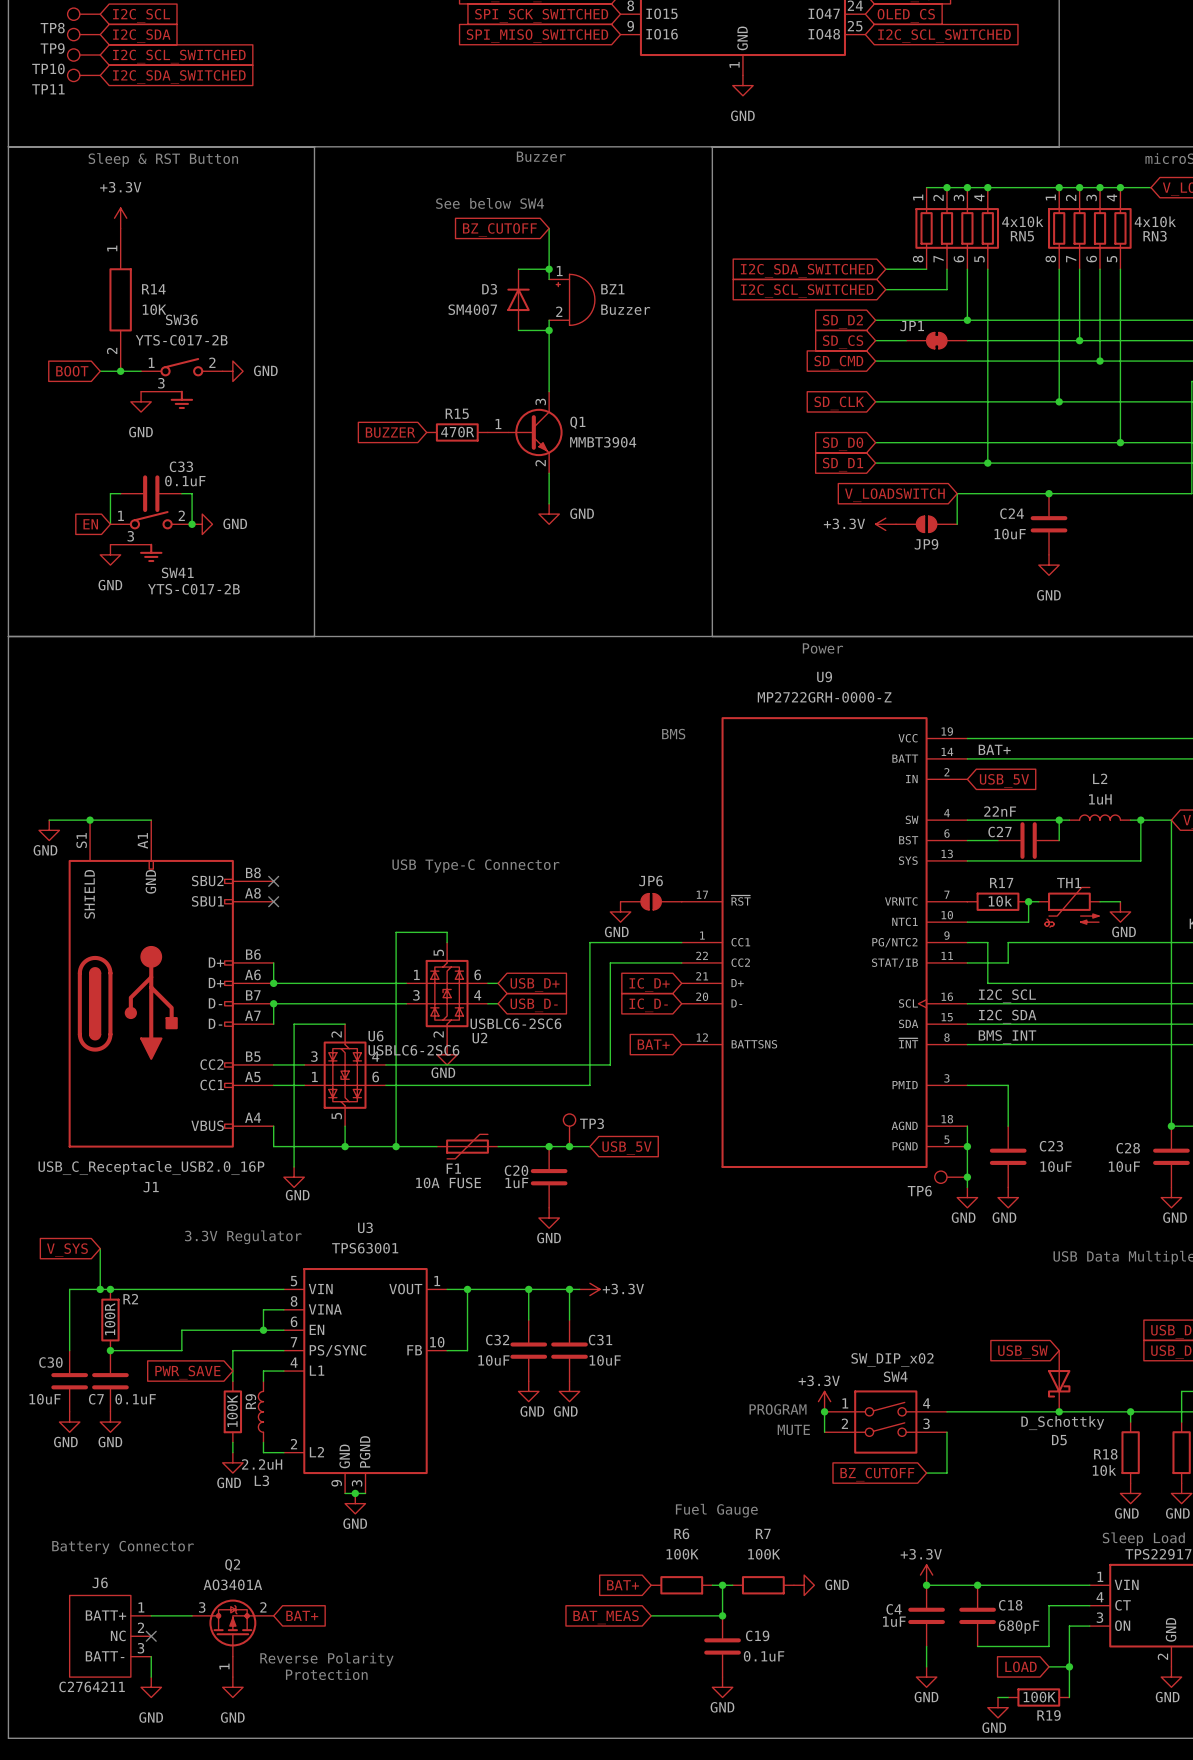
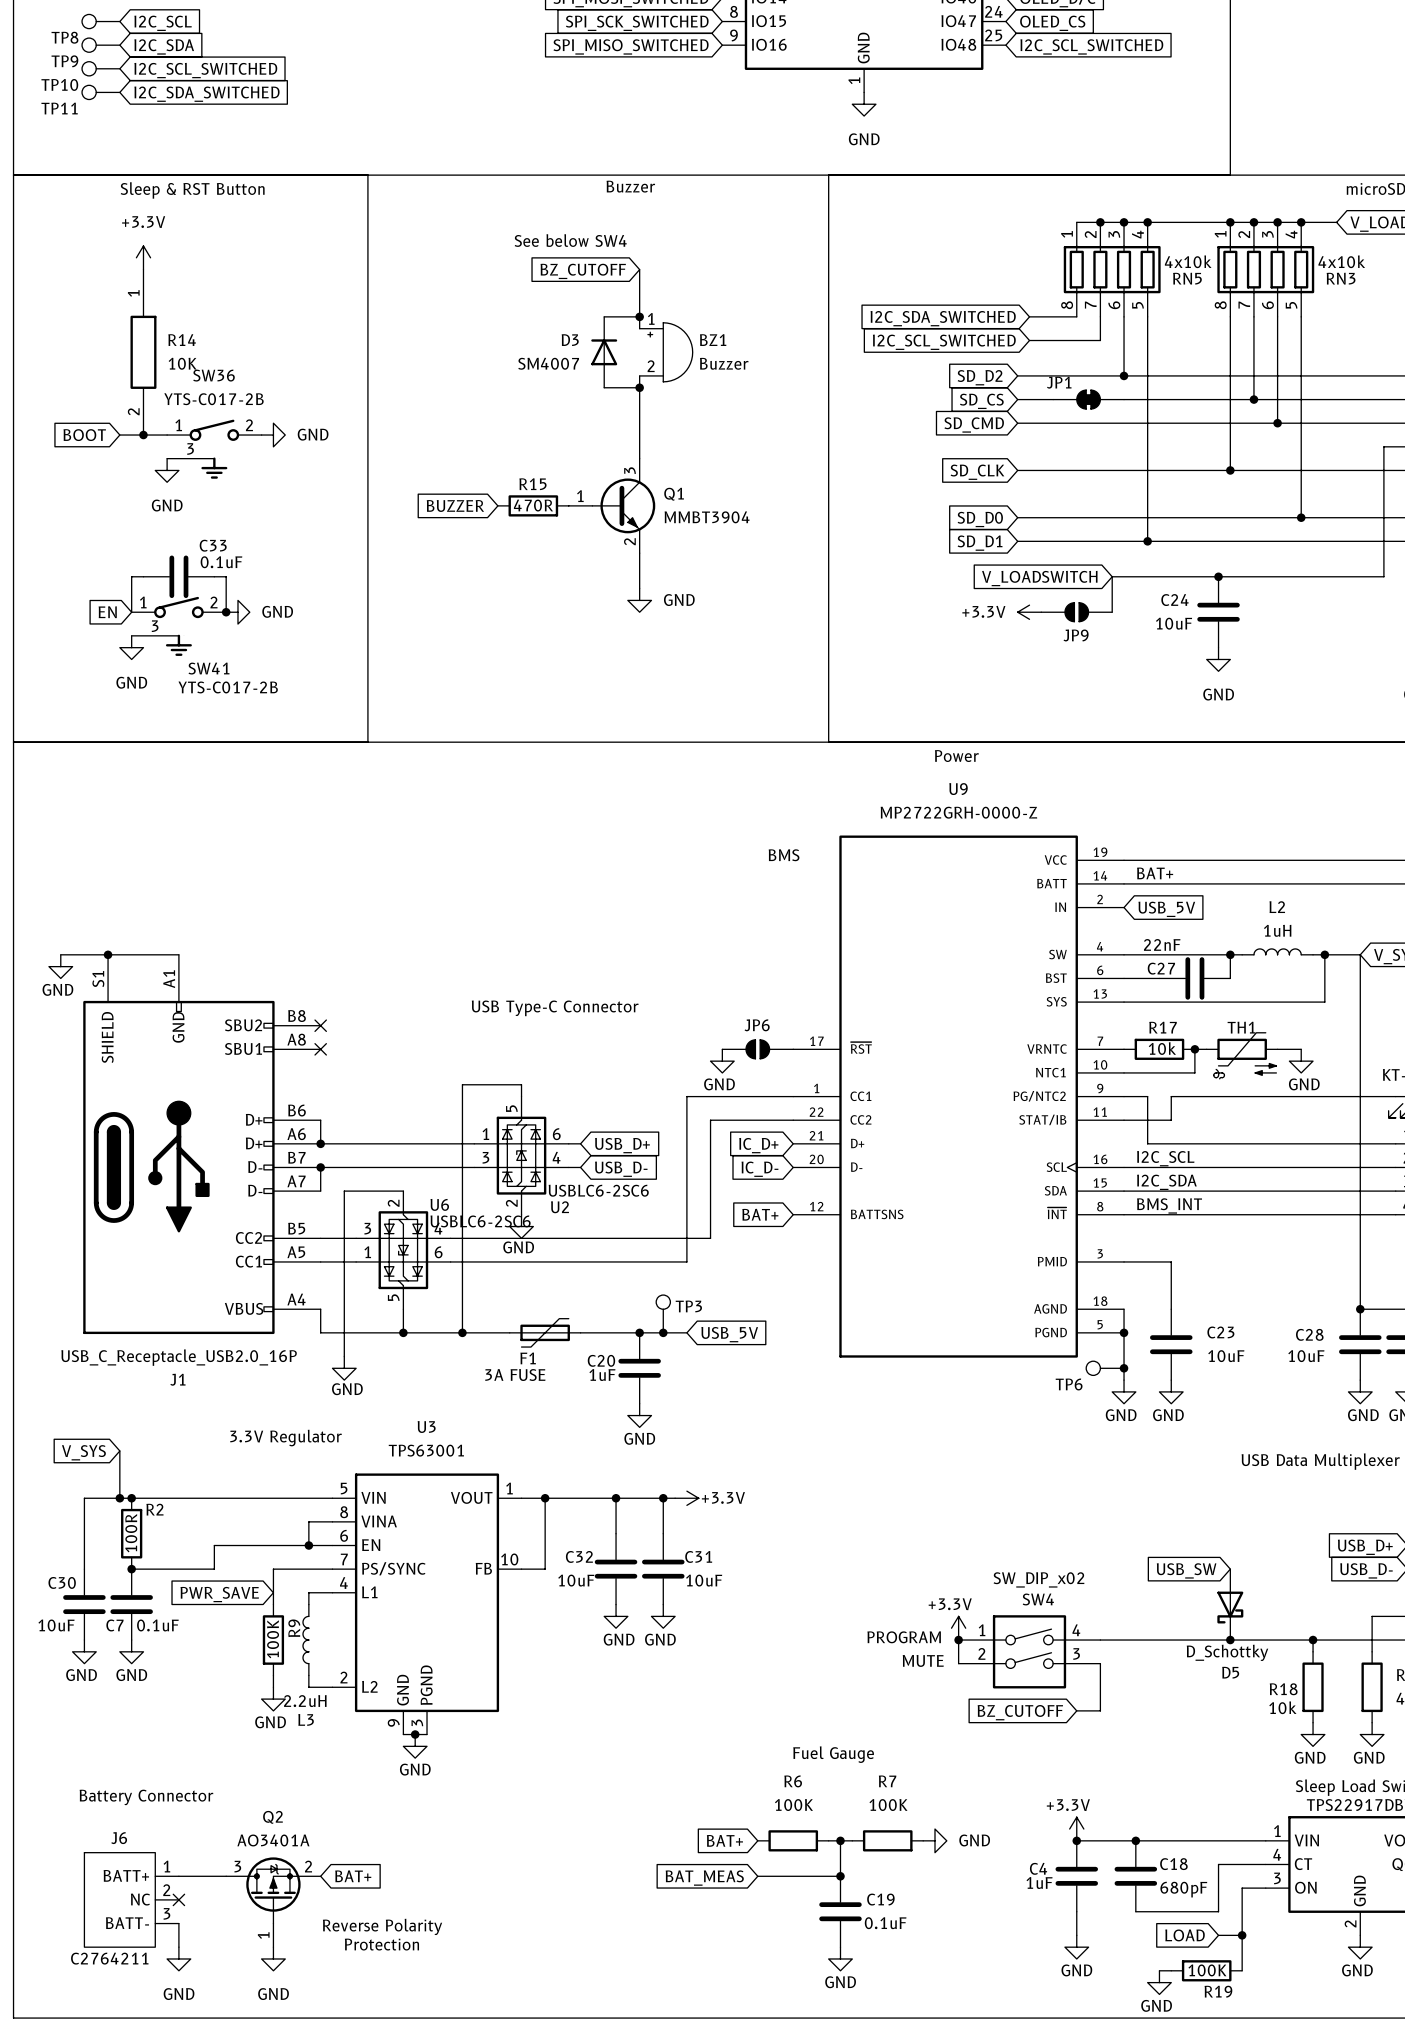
F1 value: 10A FUSE (448, 1182) -> 3A FUSE (515, 1375)

